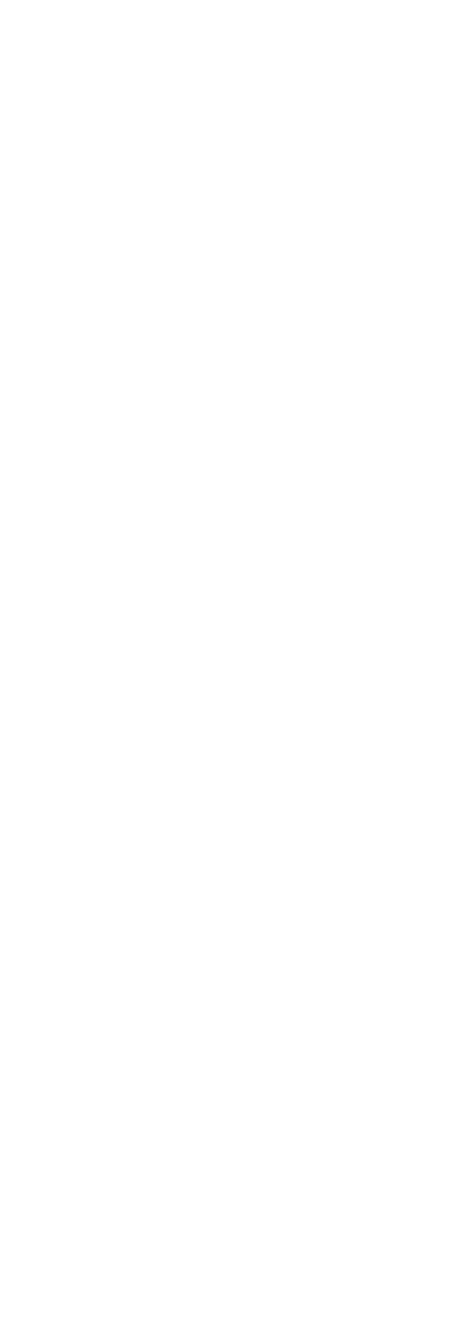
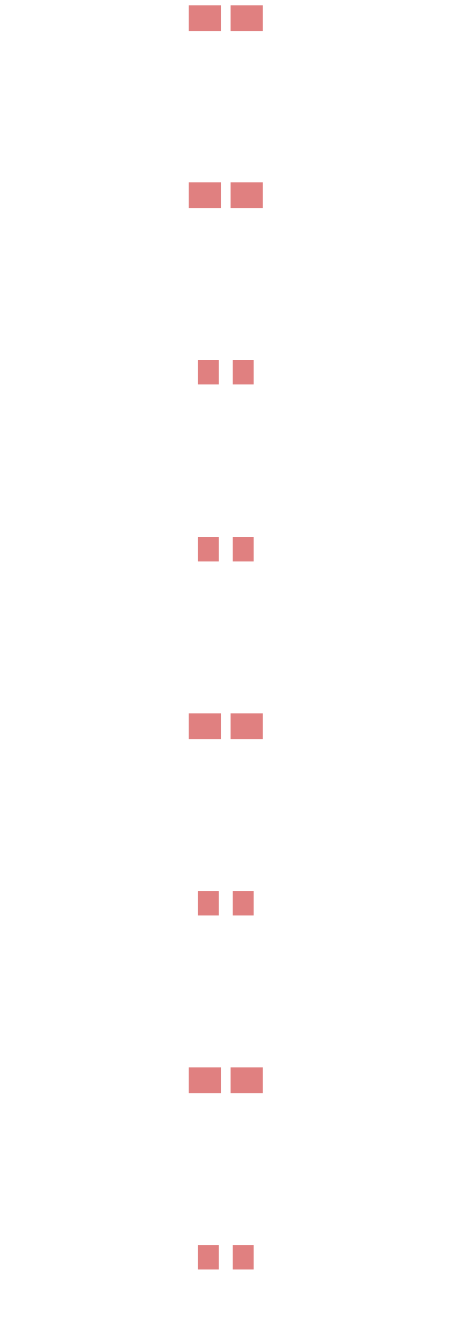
part: none -> (225, 18)
part: none -> (225, 195)
part: none -> (225, 372)
part: none -> (225, 549)
part: none -> (225, 726)
part: none -> (225, 903)
part: none -> (225, 1080)
part: none -> (225, 1257)

